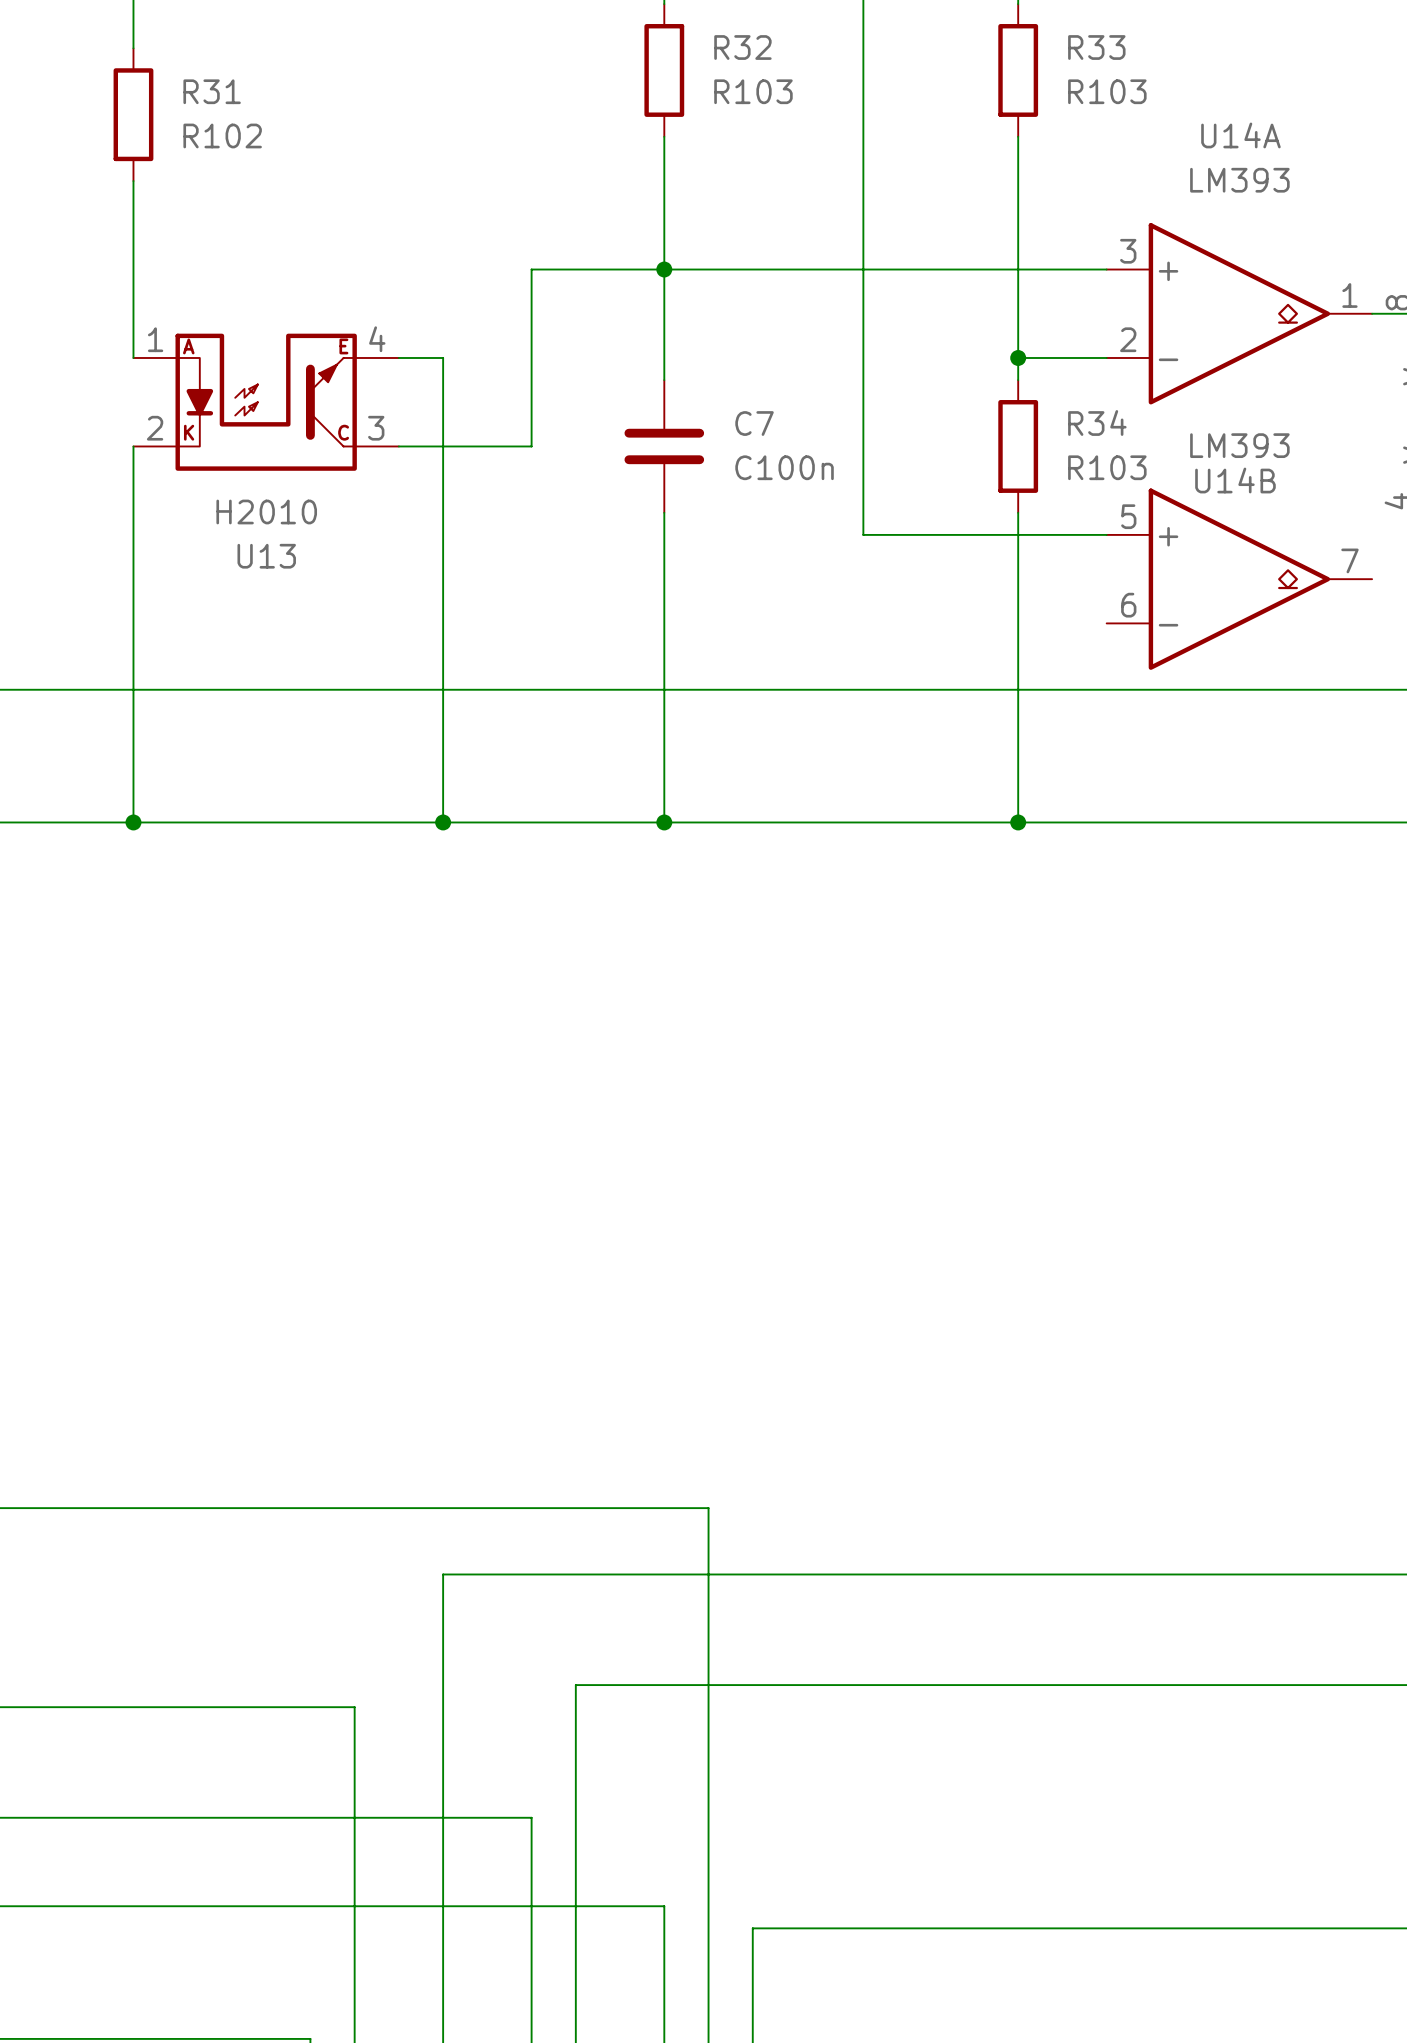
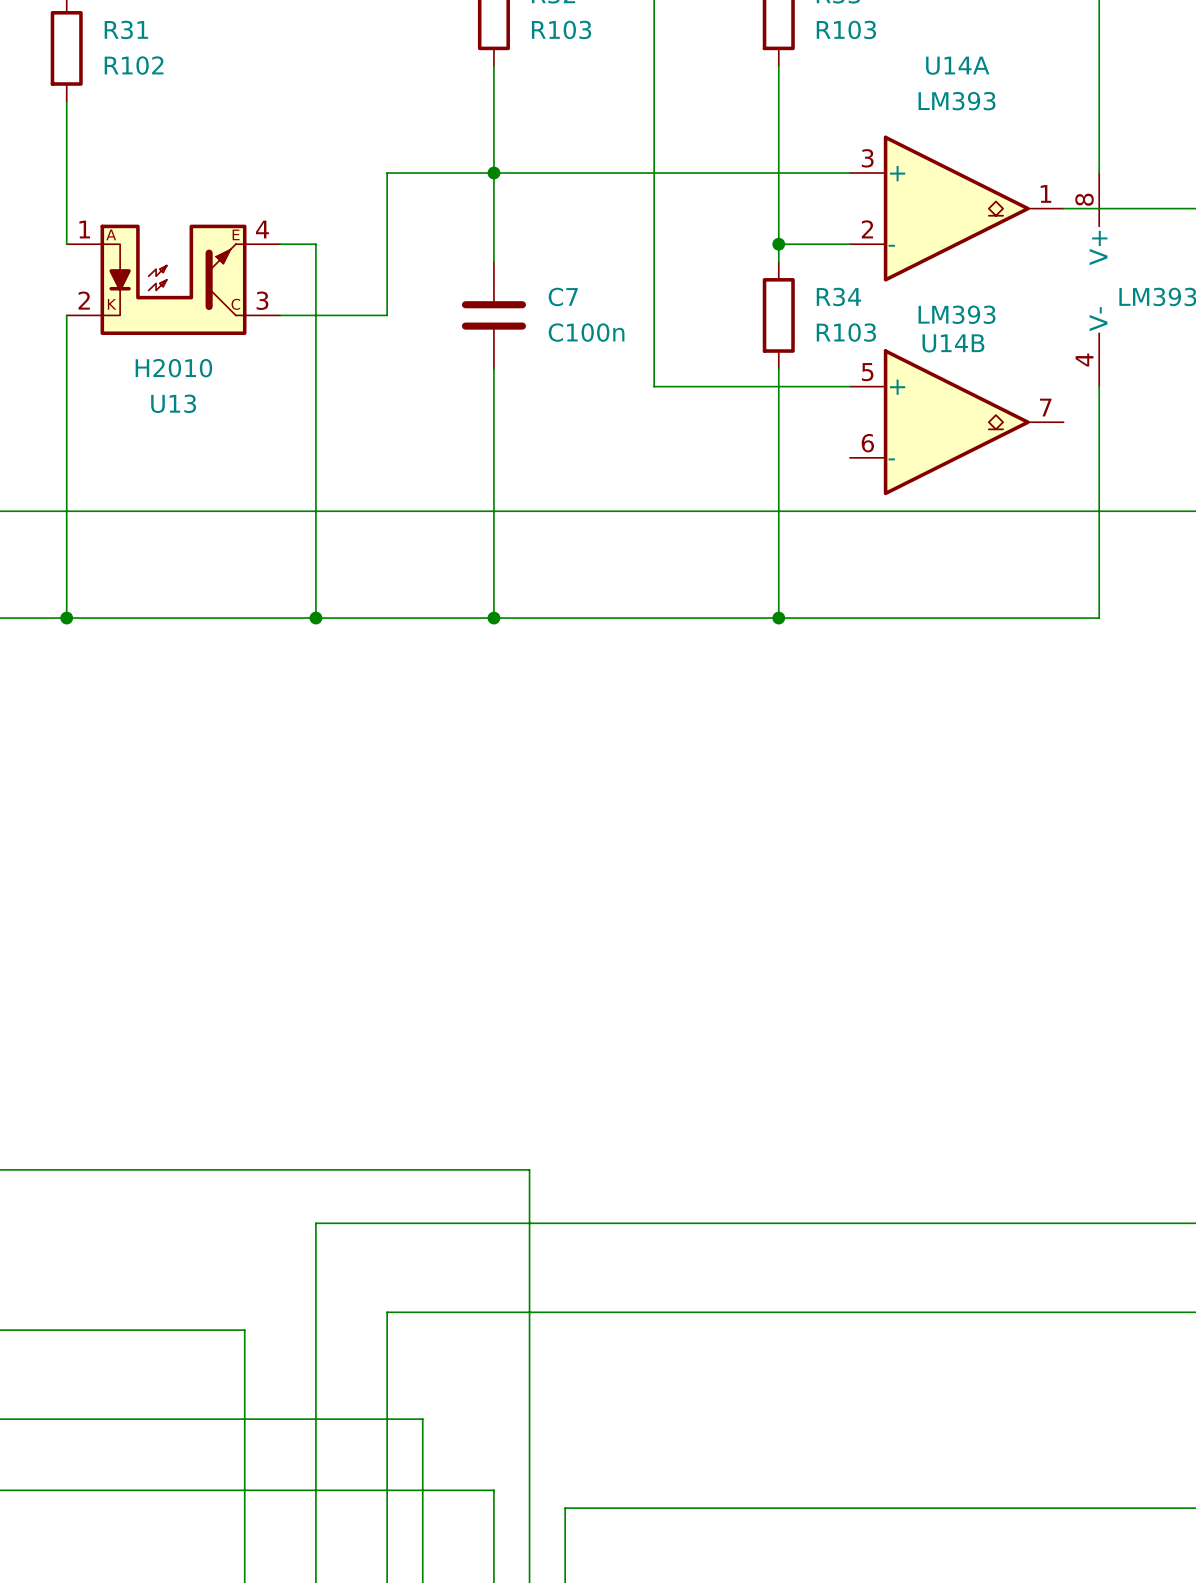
wire: (575, 1685) (575, 1817) -> (422, 1312) (387, 1312) (387, 1419) (422, 1419)

